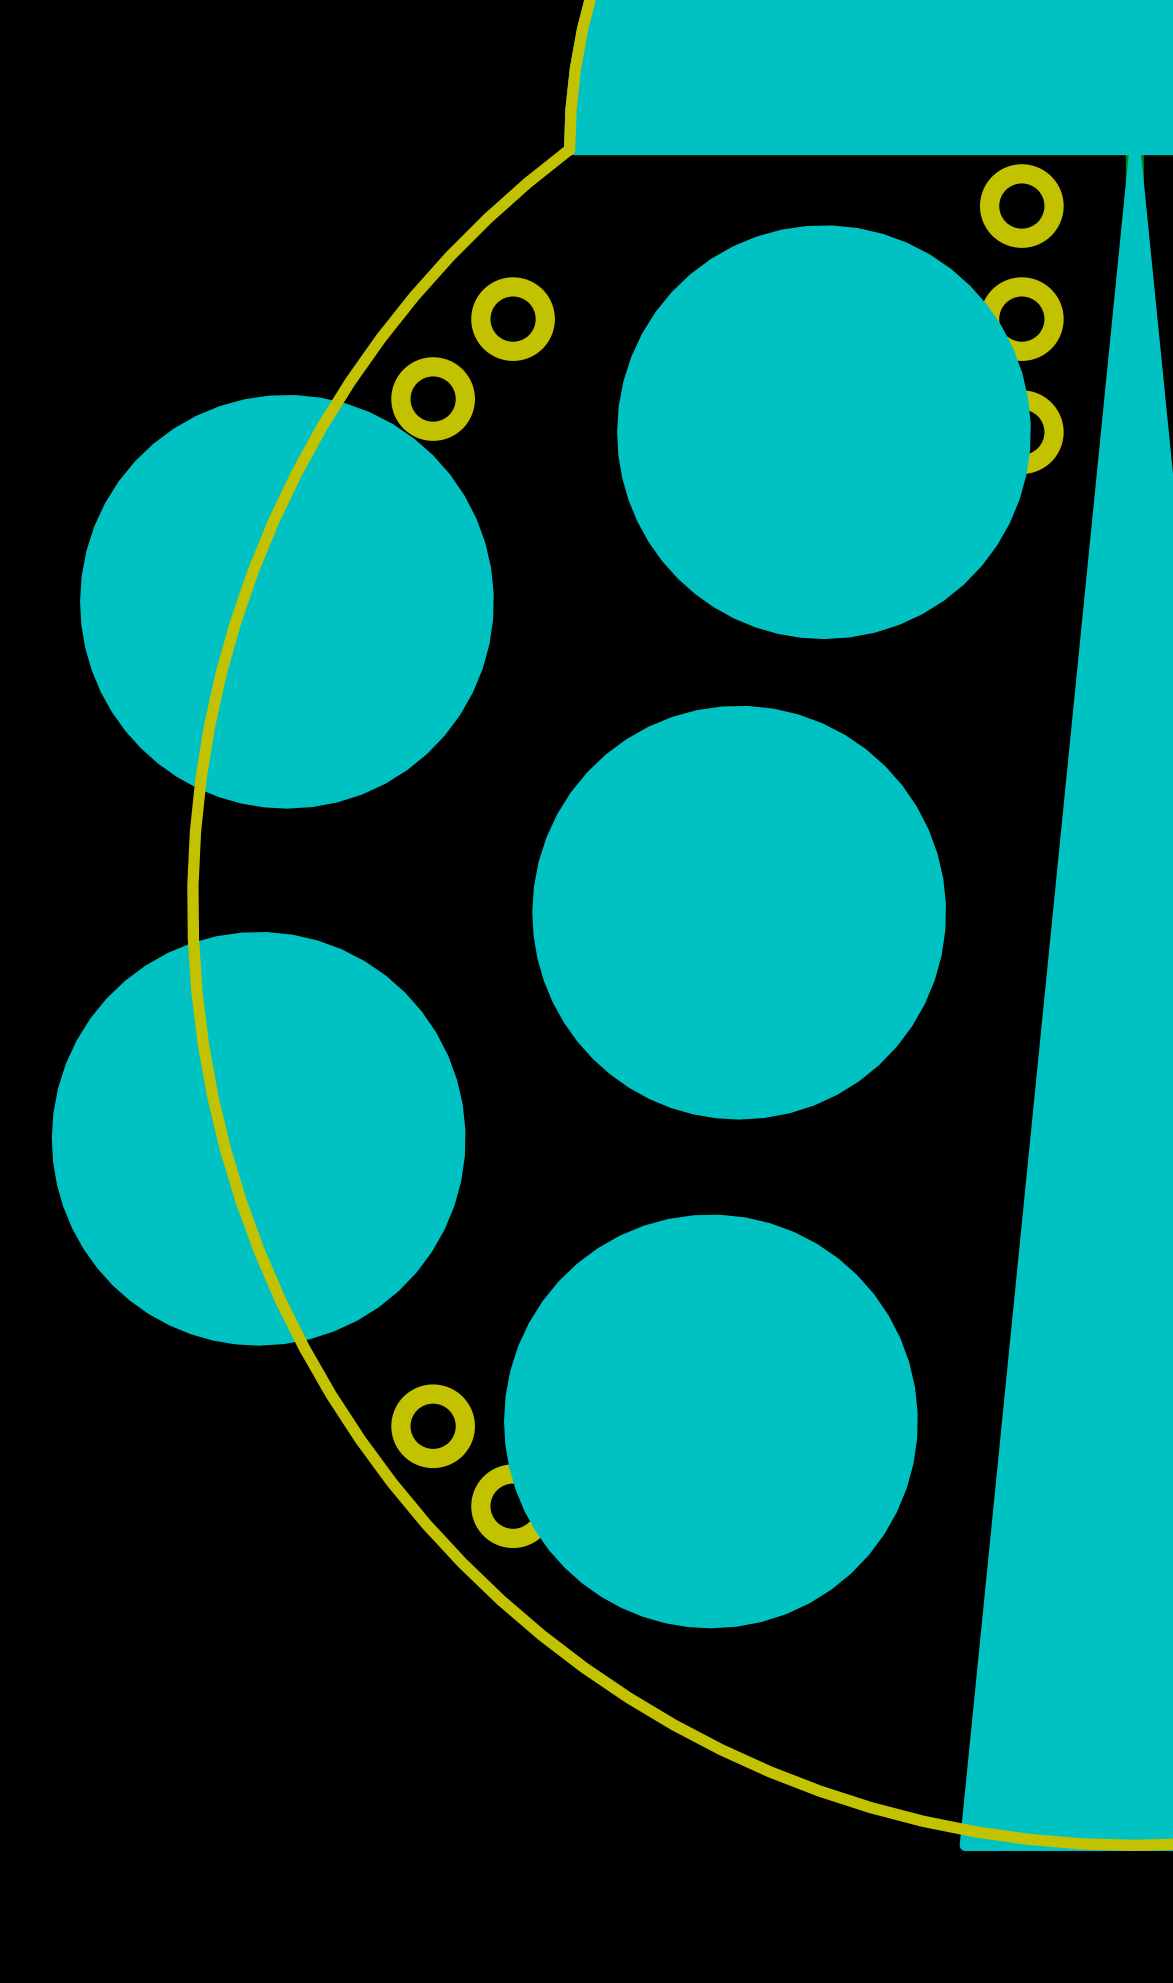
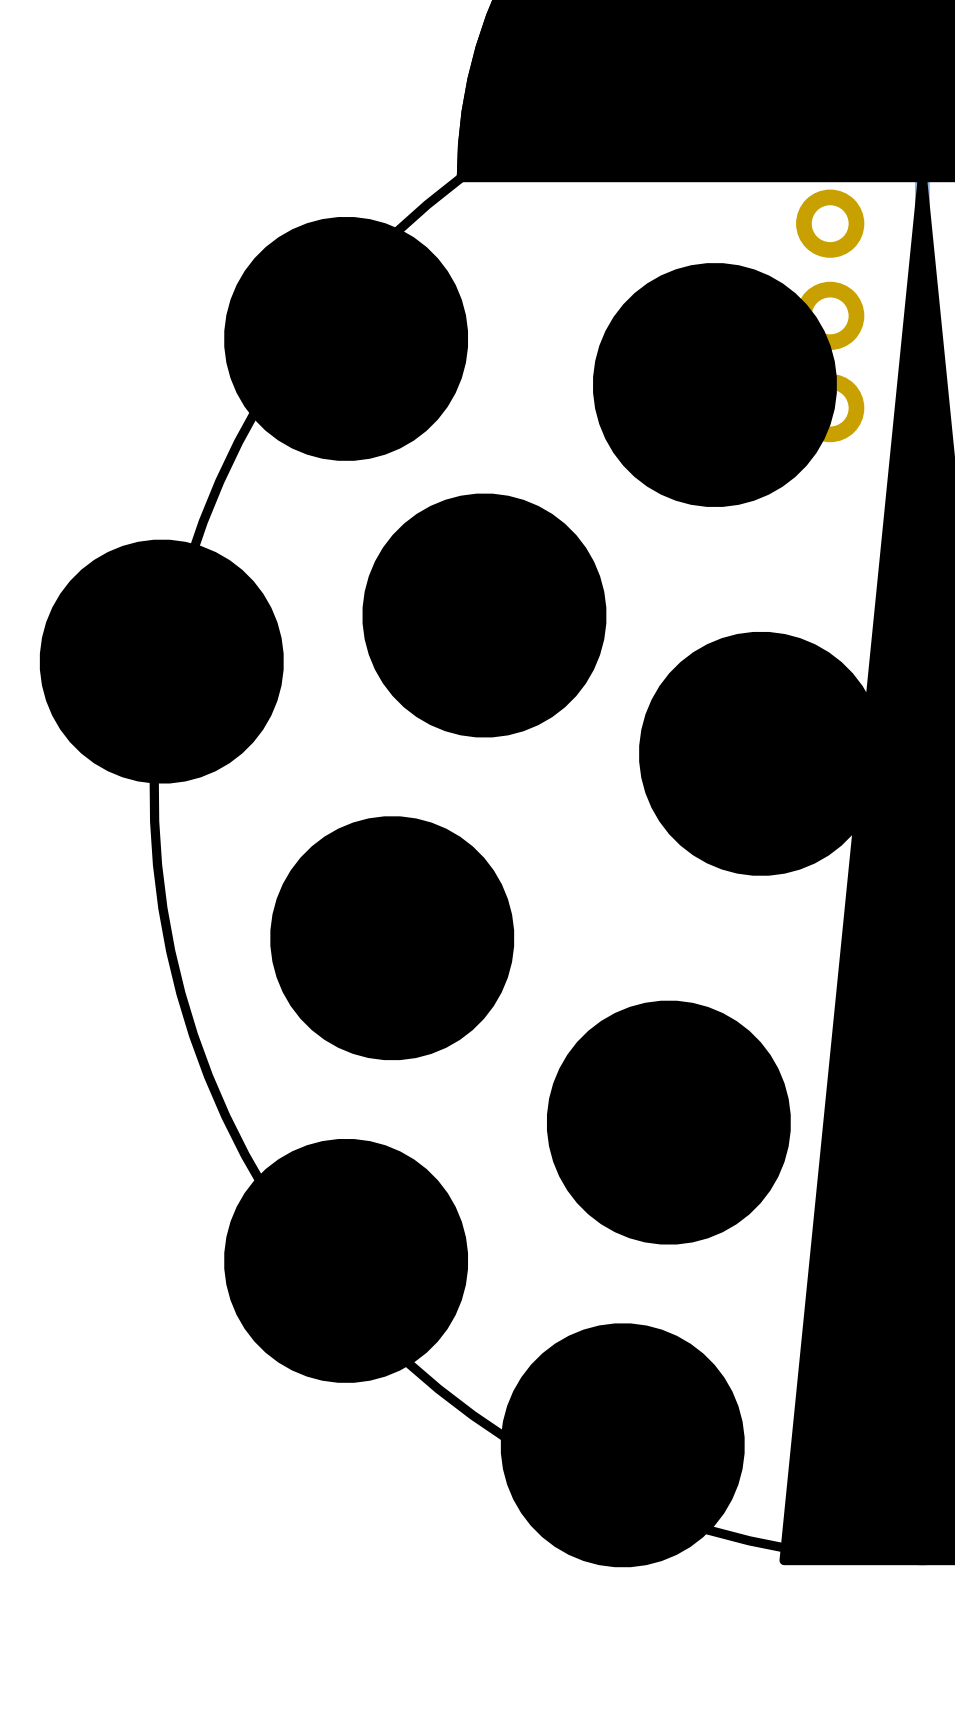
drawing: none -> [224, 217, 883, 876]
drawing: [617, 225, 1031, 640] -> none
drawing: [80, 395, 946, 1120] -> none
drawing: none -> [39, 539, 791, 1245]
drawing: [51, 932, 918, 1629] -> none
drawing: none -> [224, 1139, 745, 1568]

